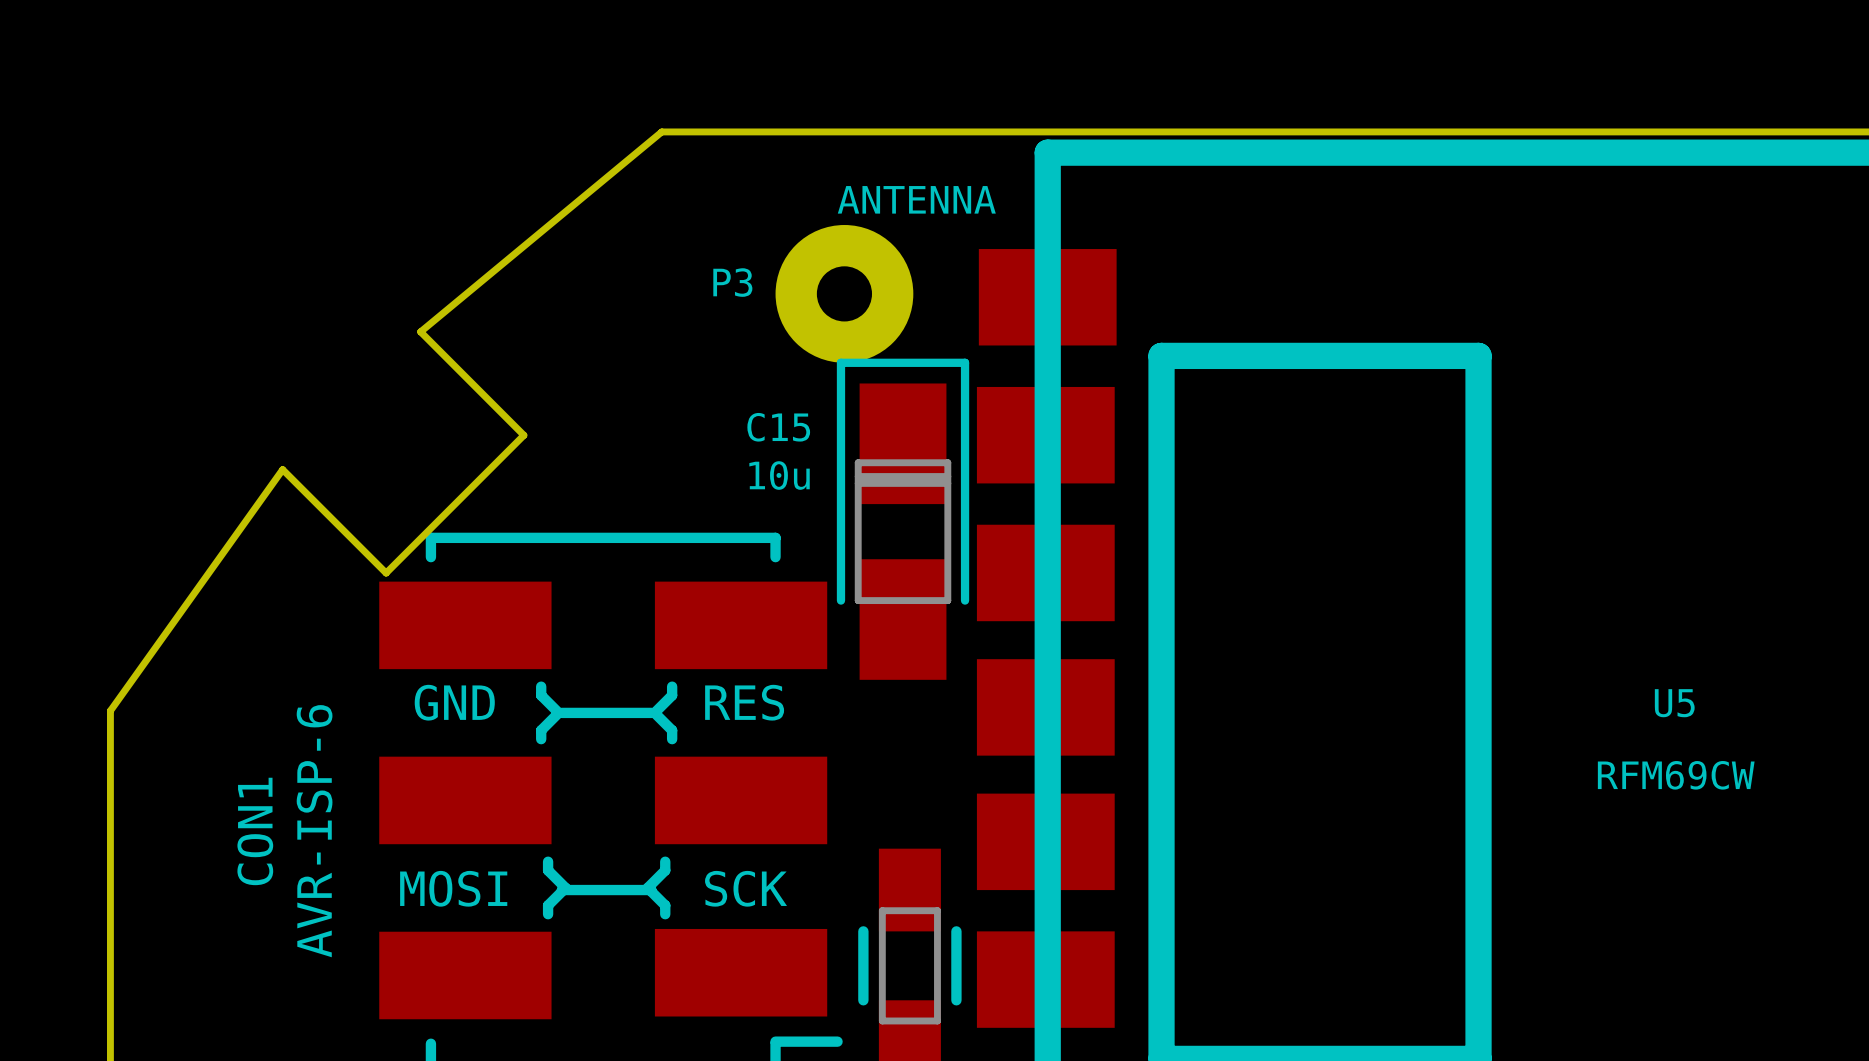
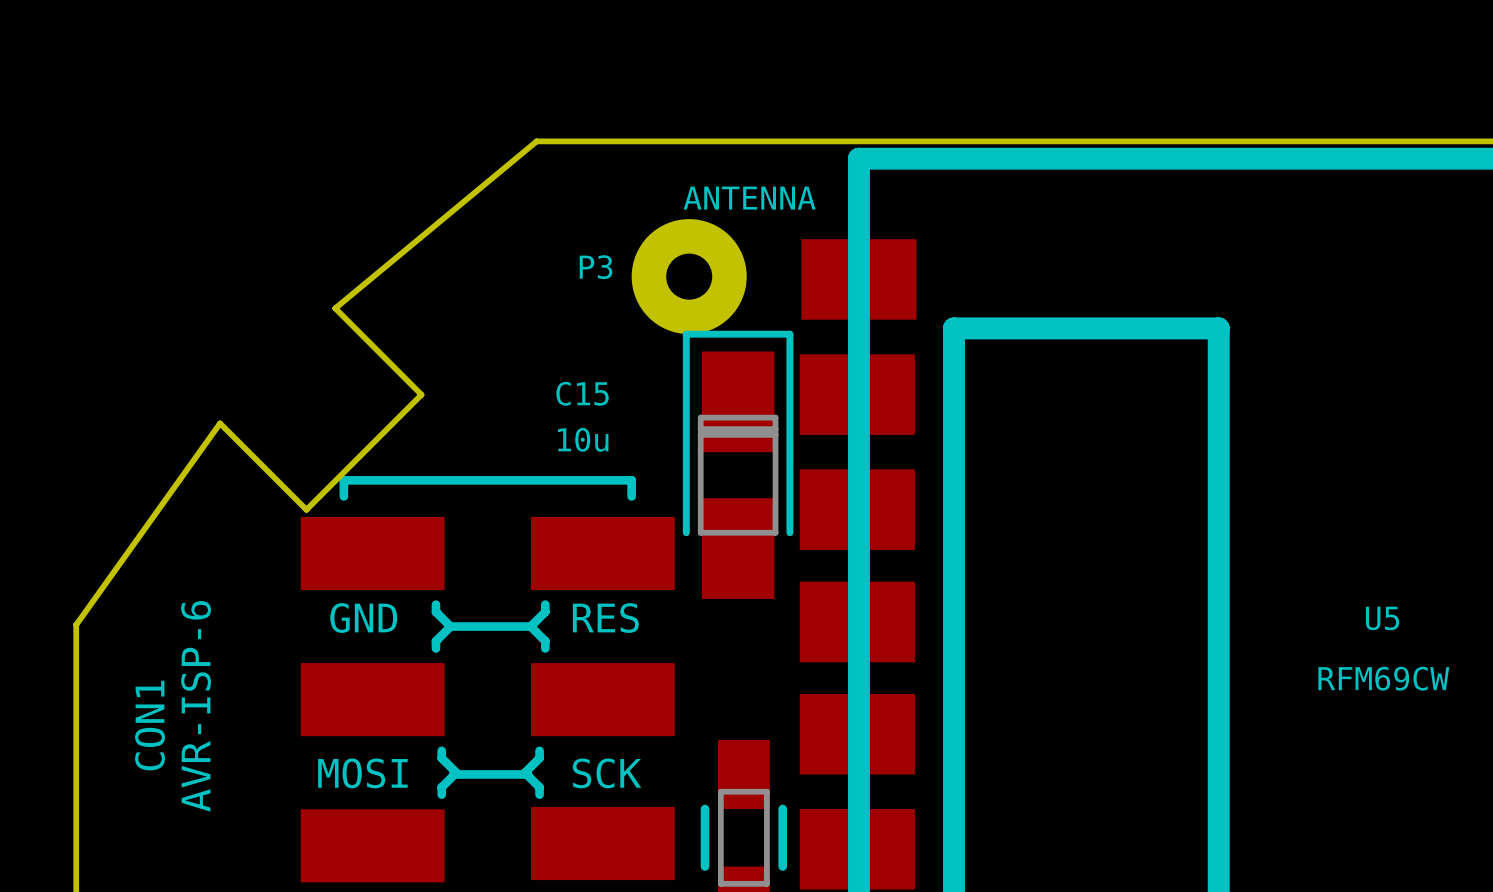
C15 name position: C15 (778, 427) -> C15 (582, 393)
C15 value position: 10u (779, 475) -> 10u (583, 439)
CON1 name position: CON1 (255, 831) -> CON1 (150, 725)
CON1 value position: AVR-ISP-6 (314, 831) -> AVR-ISP-6 (196, 706)

